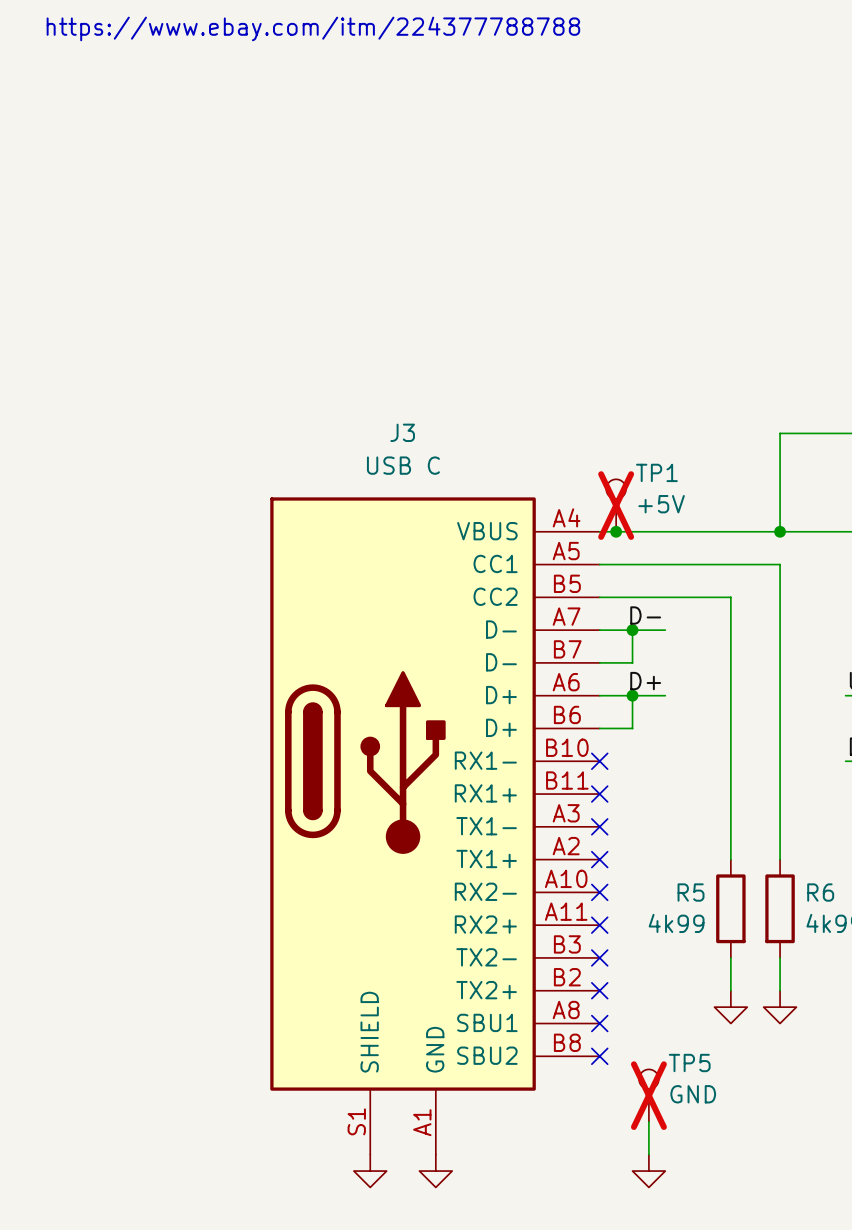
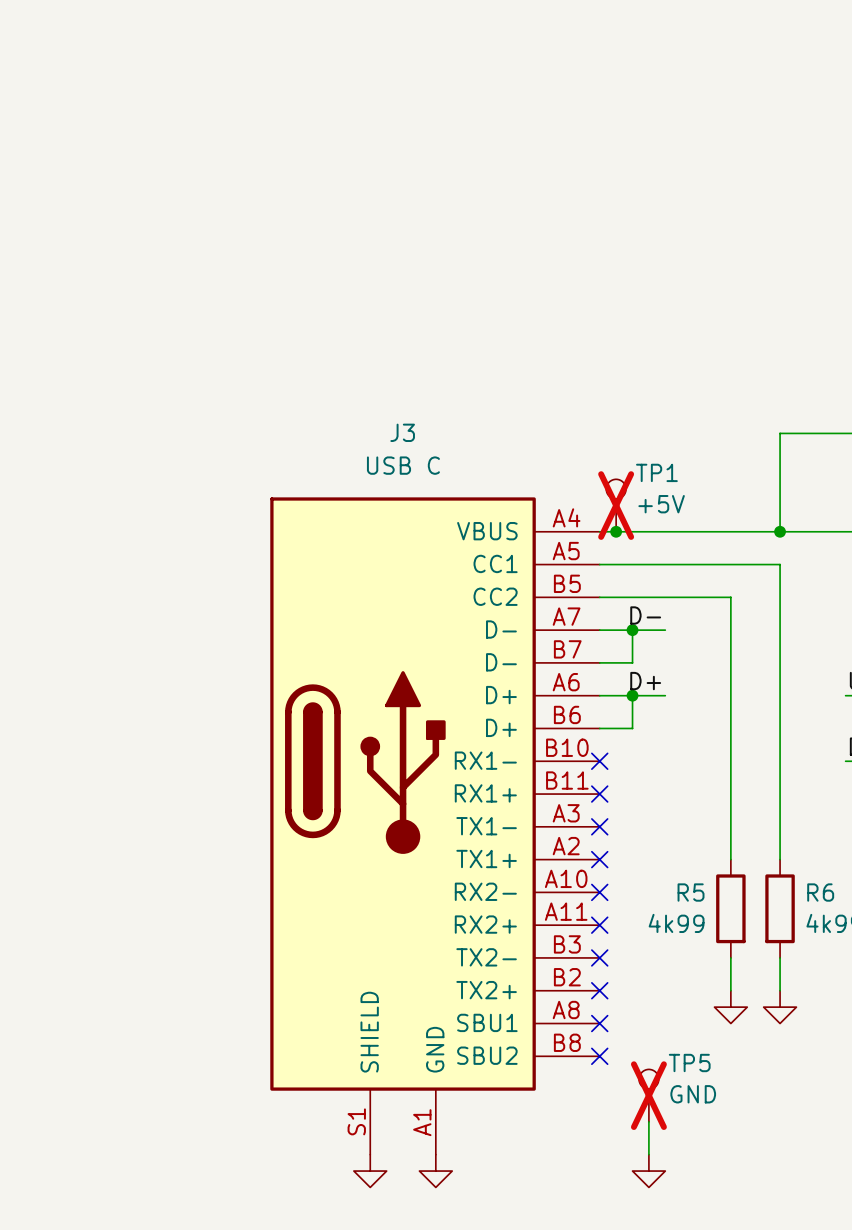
text: https://www.ebay.com/itm/224377788788 (313, 28) -> none

